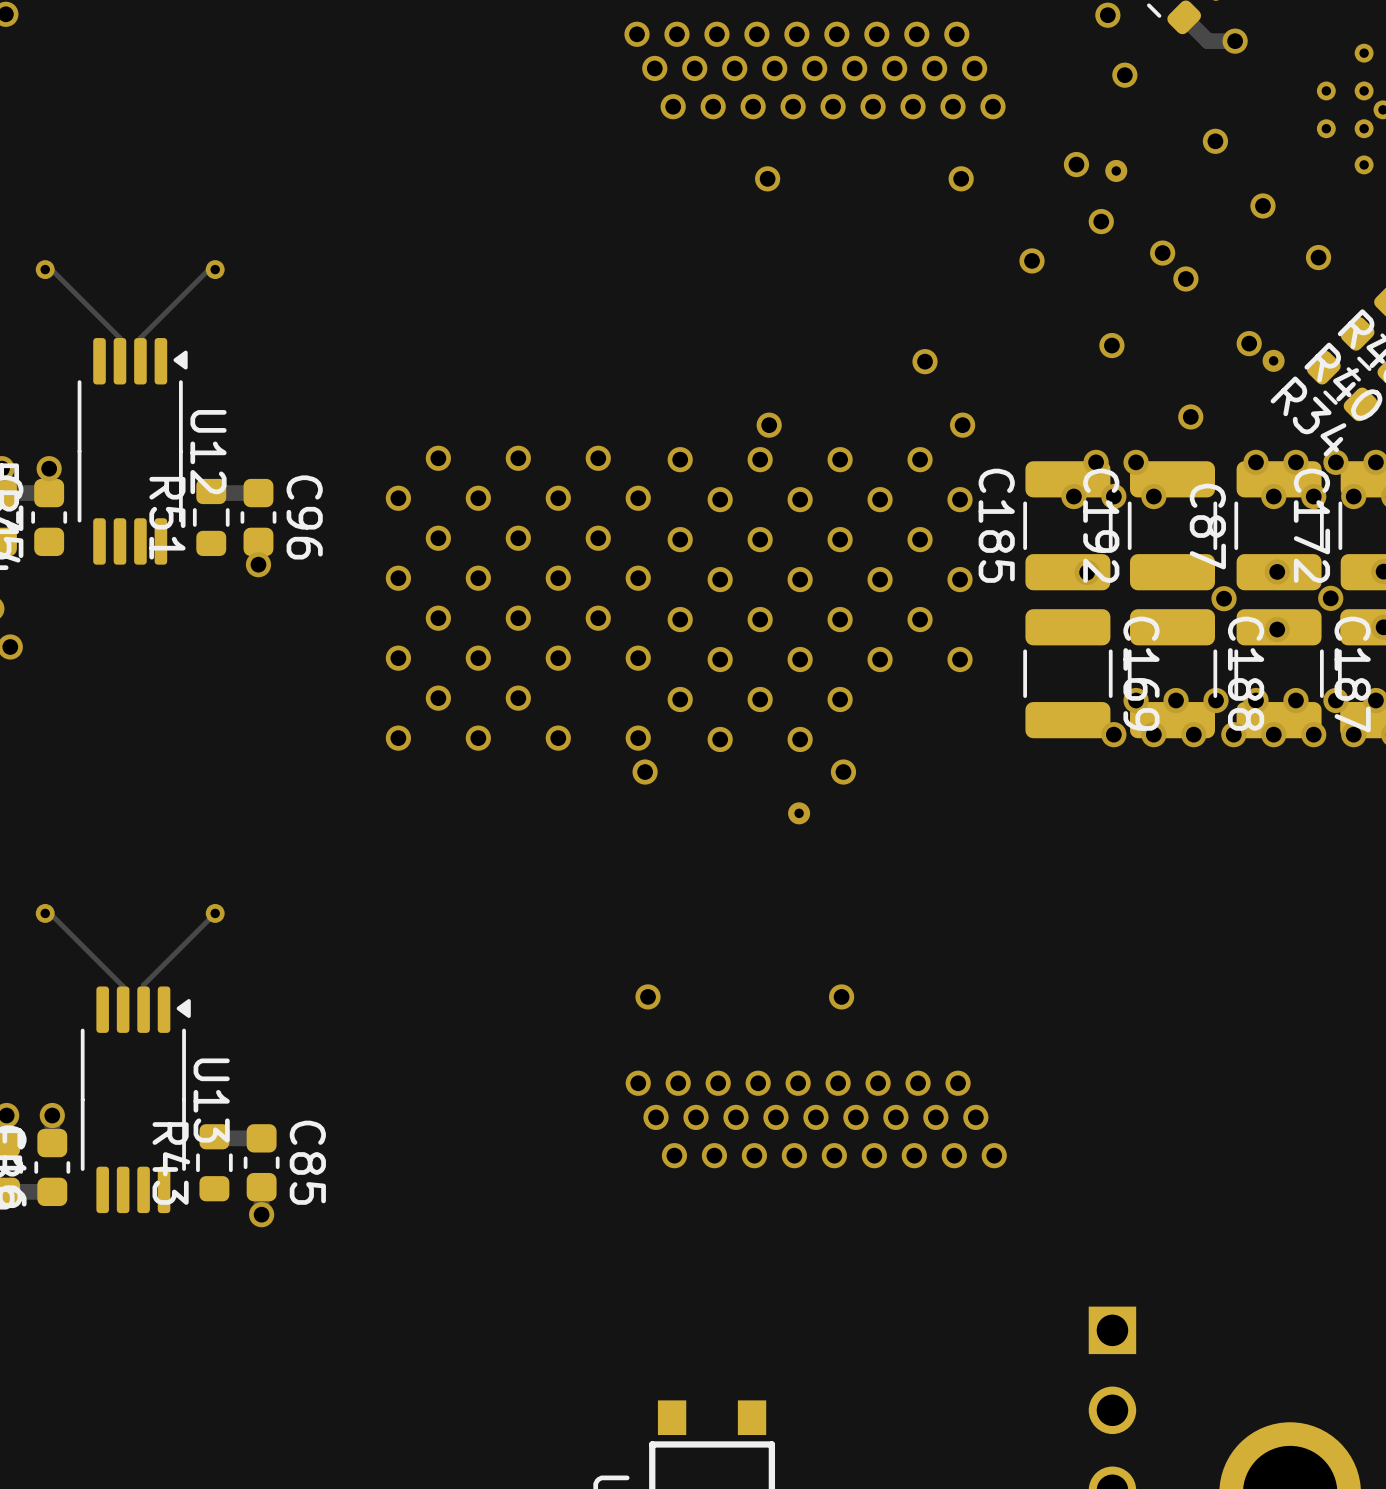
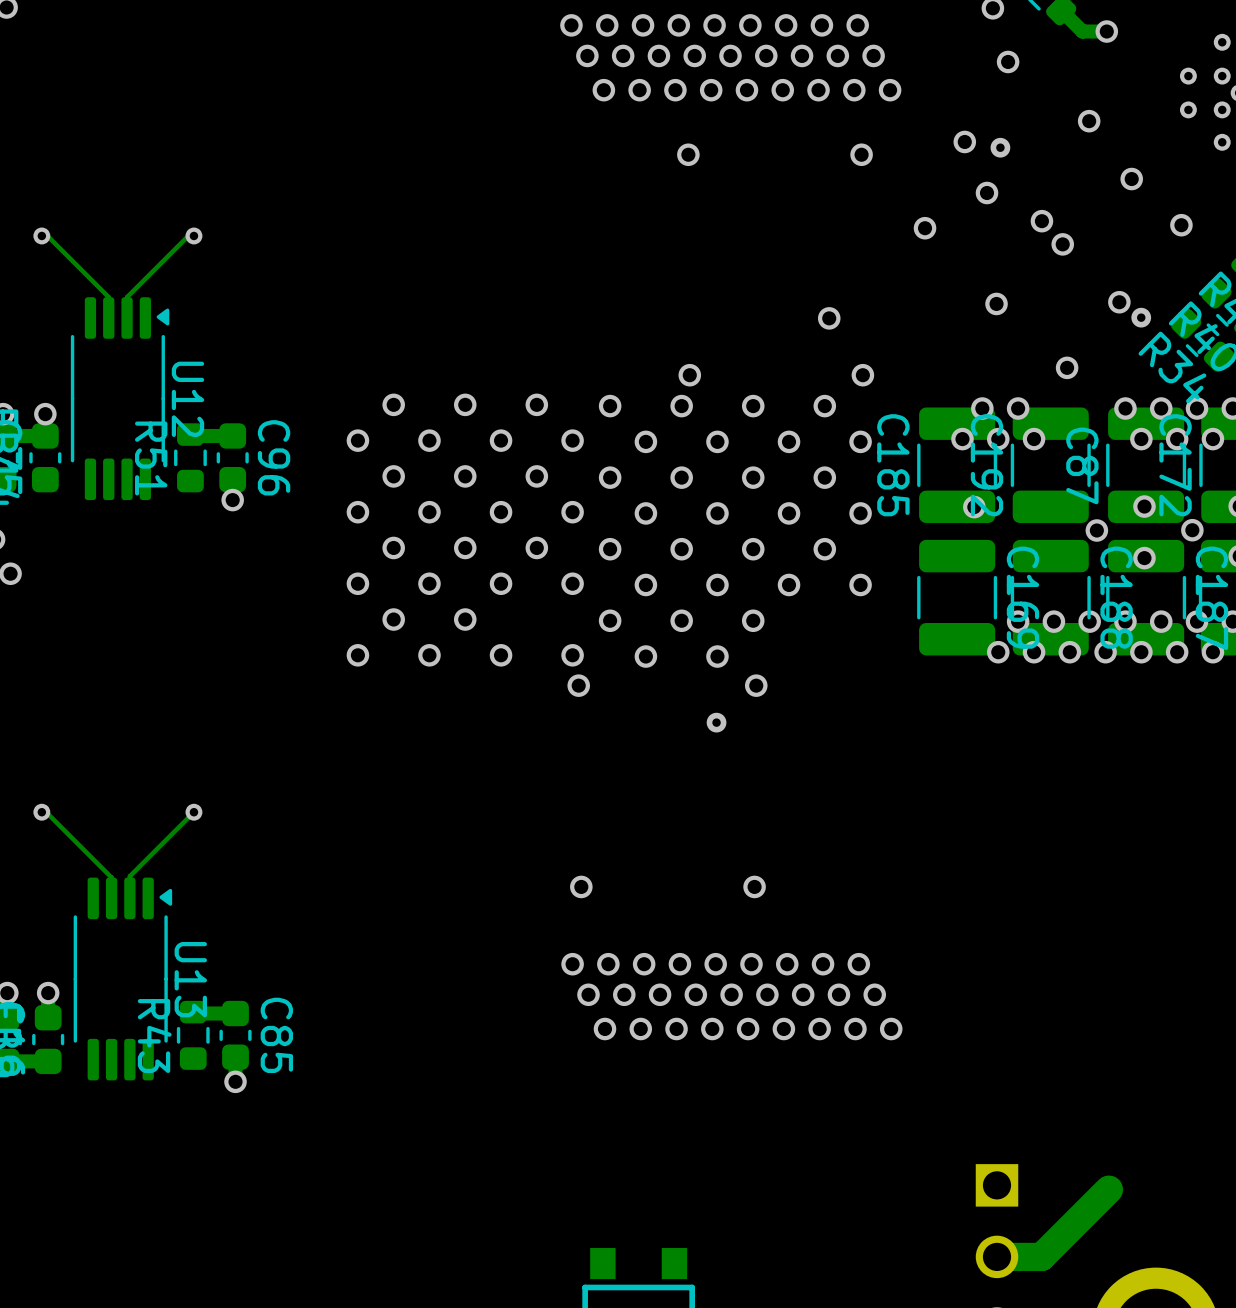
track: none -> (1108, 1189) (1041, 1256) (997, 1256)

